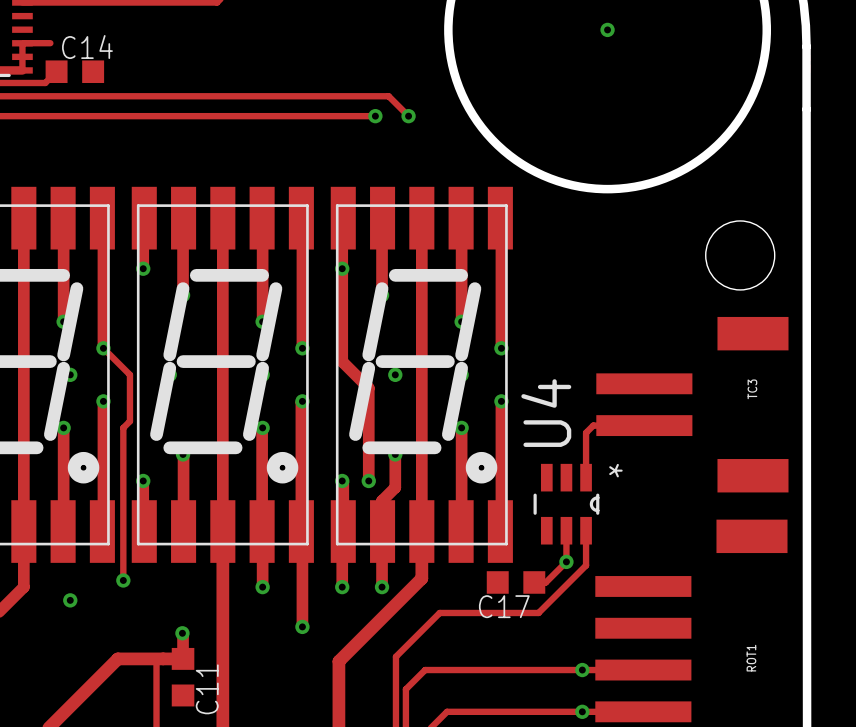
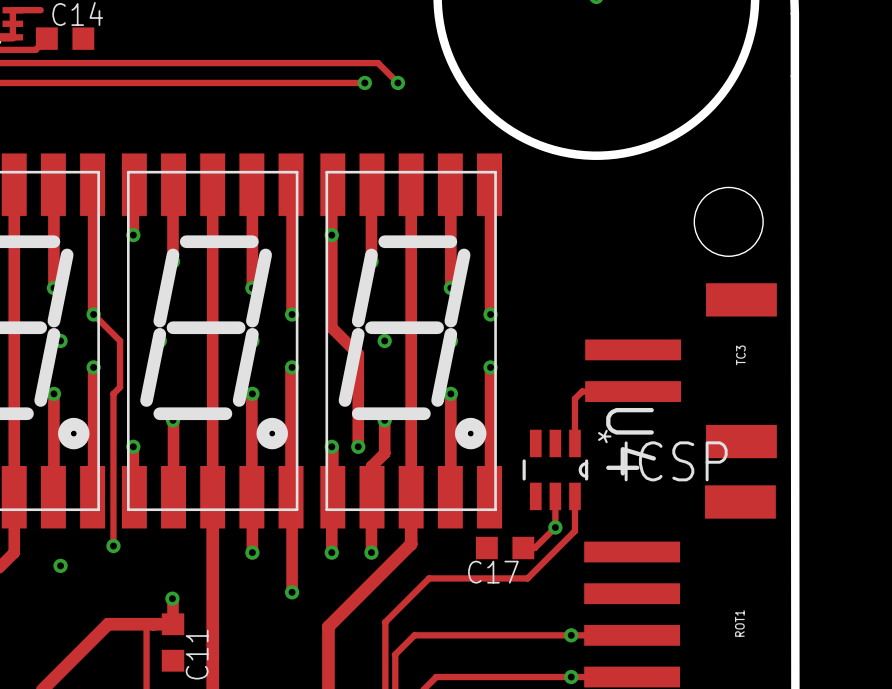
U4 name rotation: 0° (546, 413) -> 180° (631, 441)
U4 name position: U4 (546, 413) -> U4 (631, 441)
text: none -> ICSP (676, 461)

